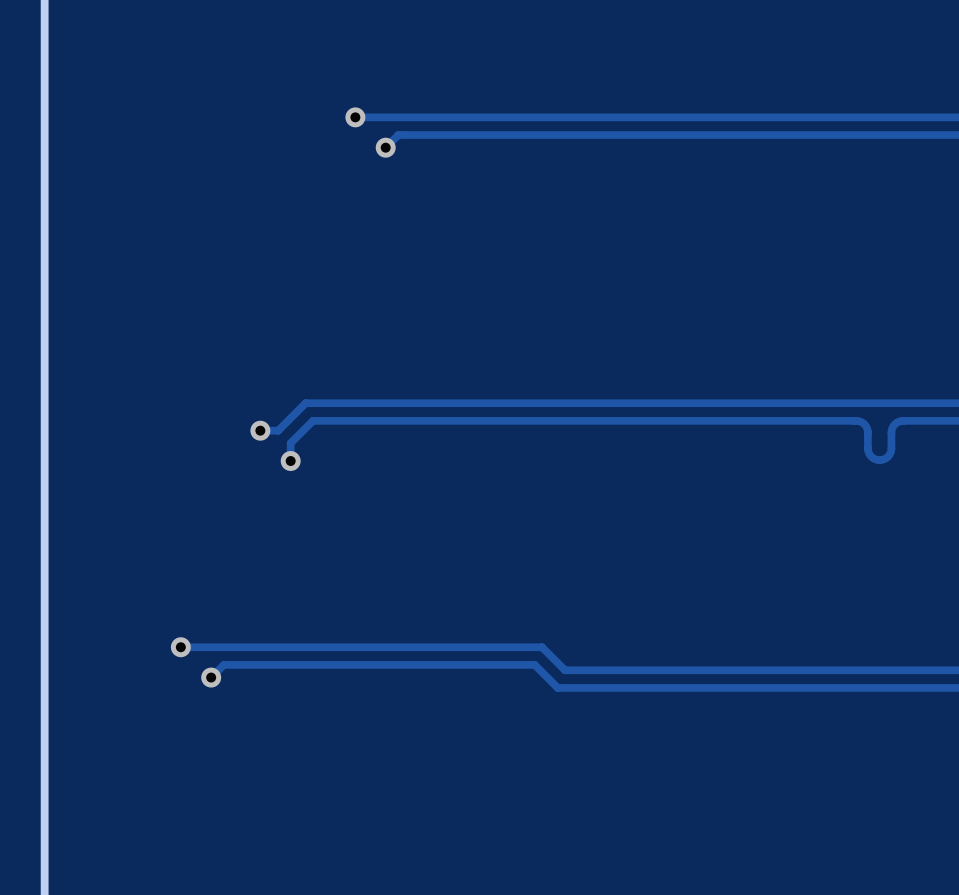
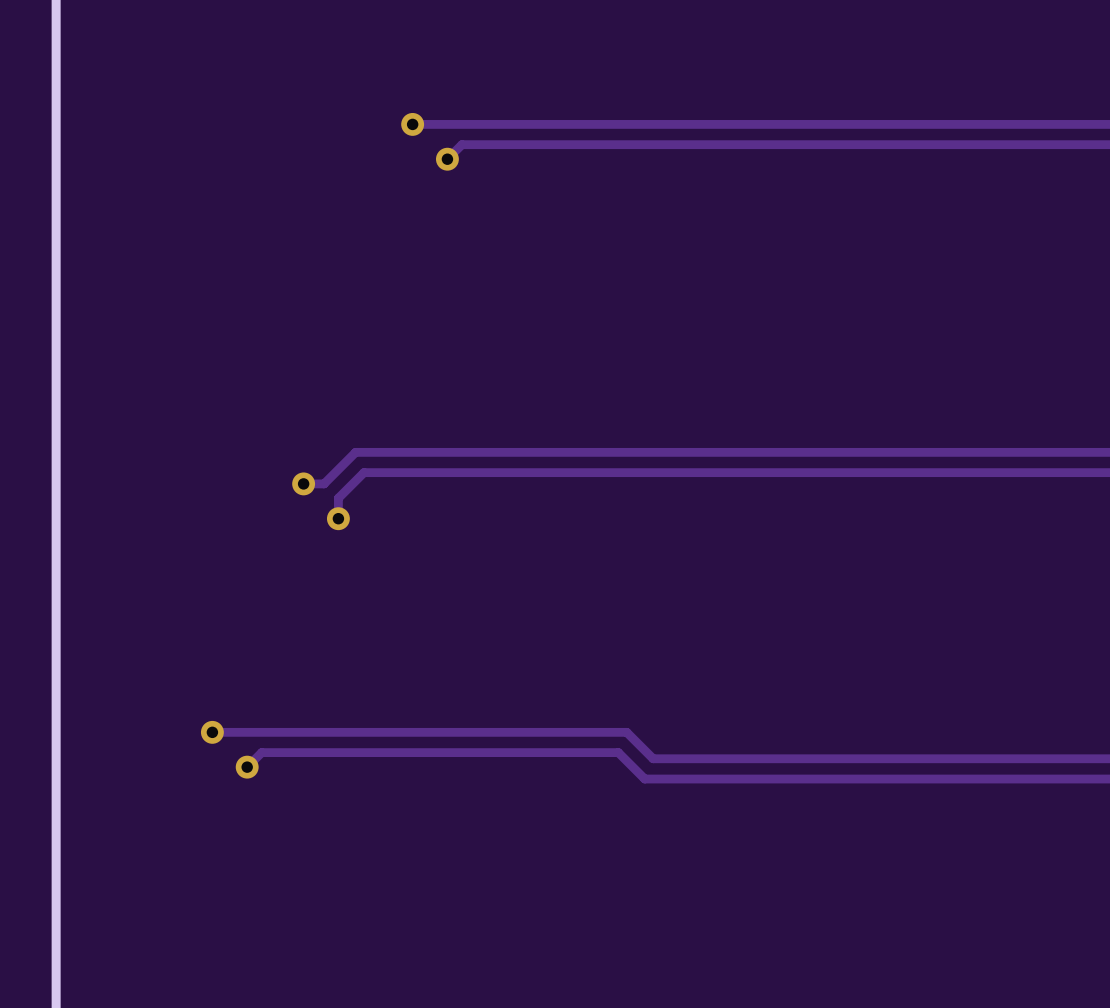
track: (903, 420) (897, 422) (893, 426) (890, 452) (886, 457) (879, 460) (873, 458) (869, 454) (866, 428) (863, 423) (856, 420) -> (1041, 472) (987, 472)

